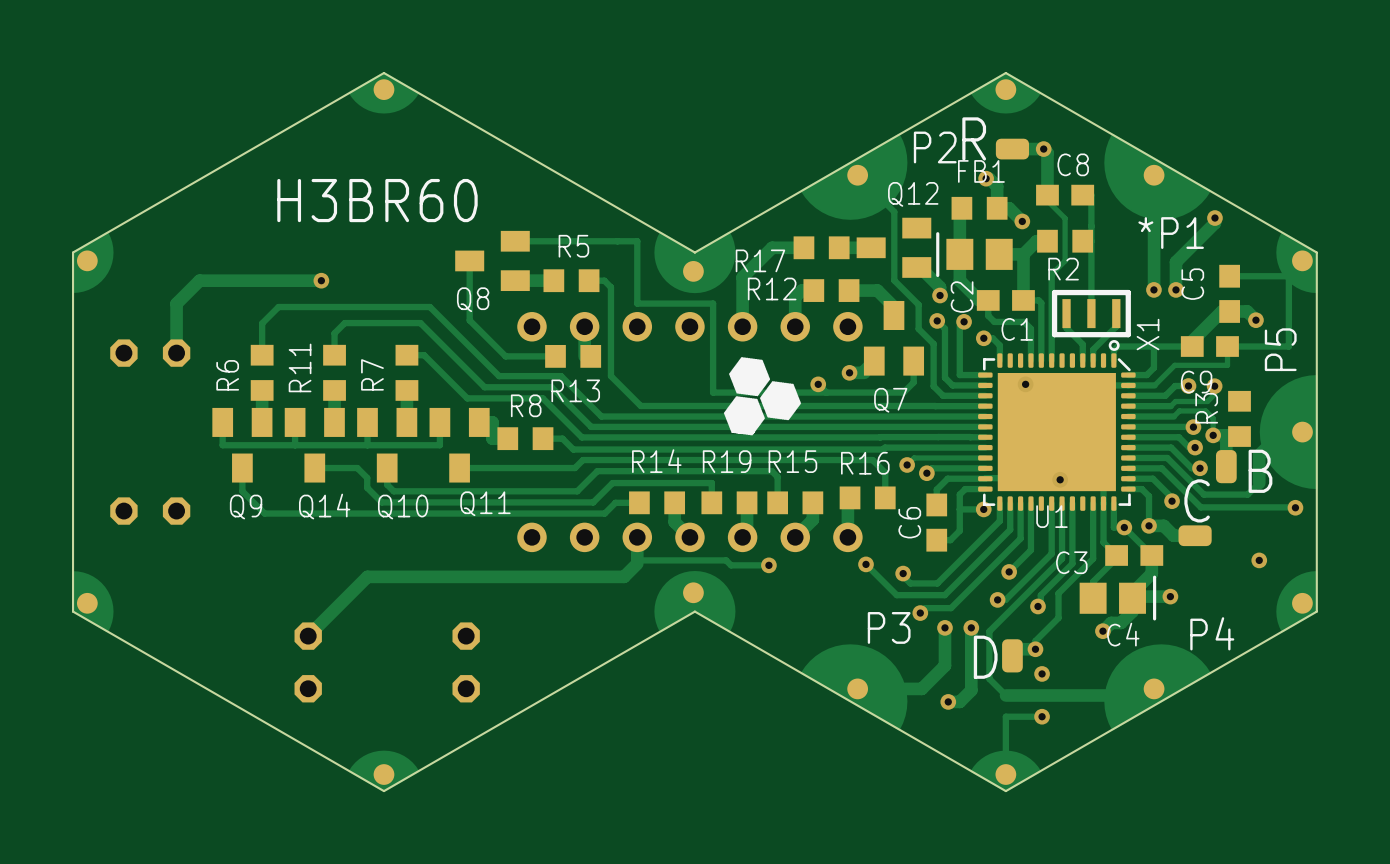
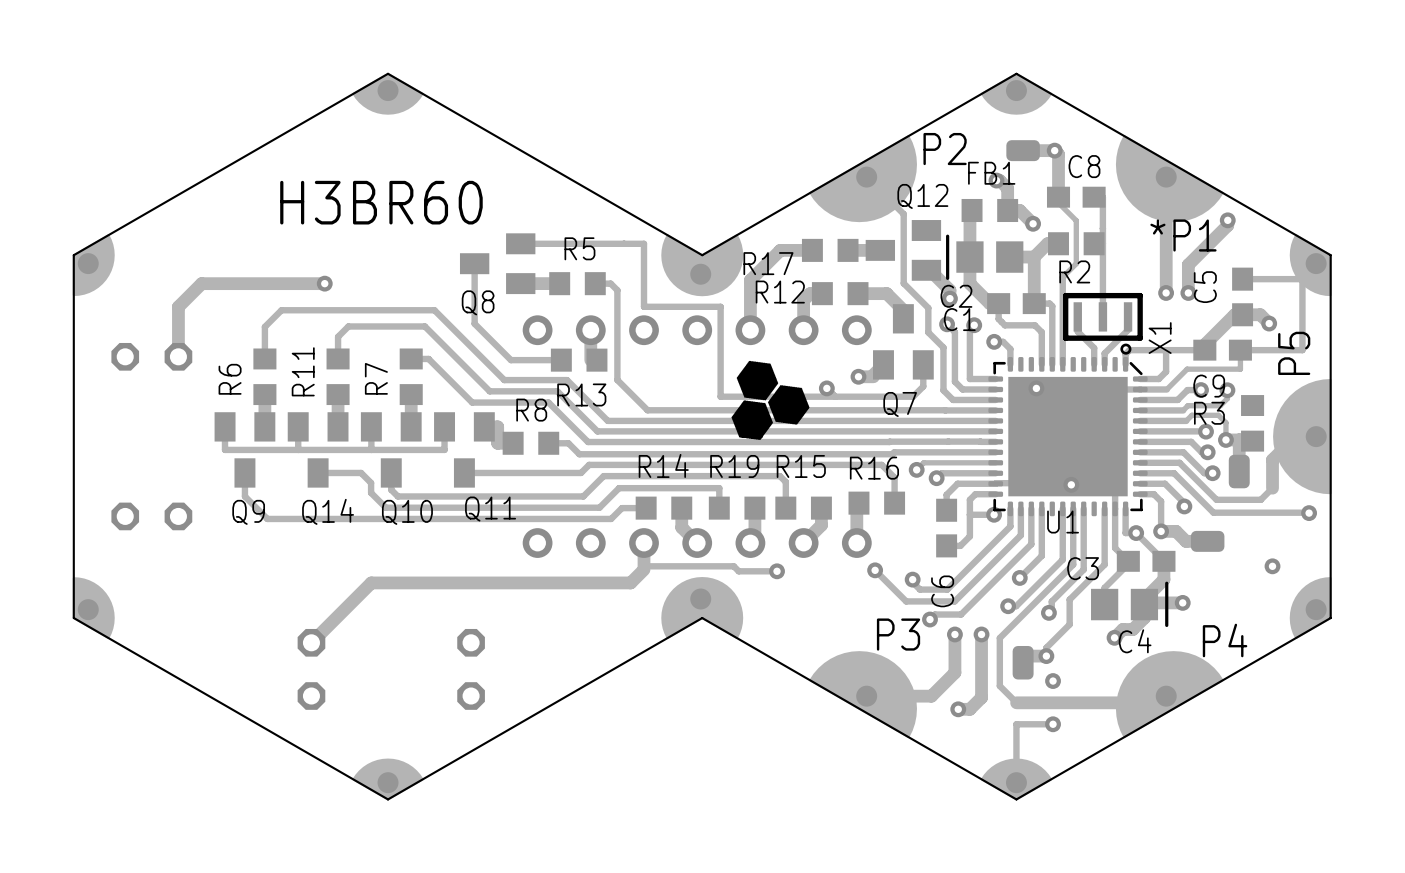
text: R (974, 138) -> none
C2 name rotation: 0° (962, 297) -> 90° clockwise (956, 296)
C1 name position: C1 (1017, 329) -> C1 (959, 319)
R3 name rotation: 0° (1206, 408) -> 90° clockwise (1209, 413)
text: B (1260, 471) -> none
text: C (1197, 500) -> none
C6 name position: C6 (909, 522) -> C6 (942, 591)
text: D (985, 657) -> none

